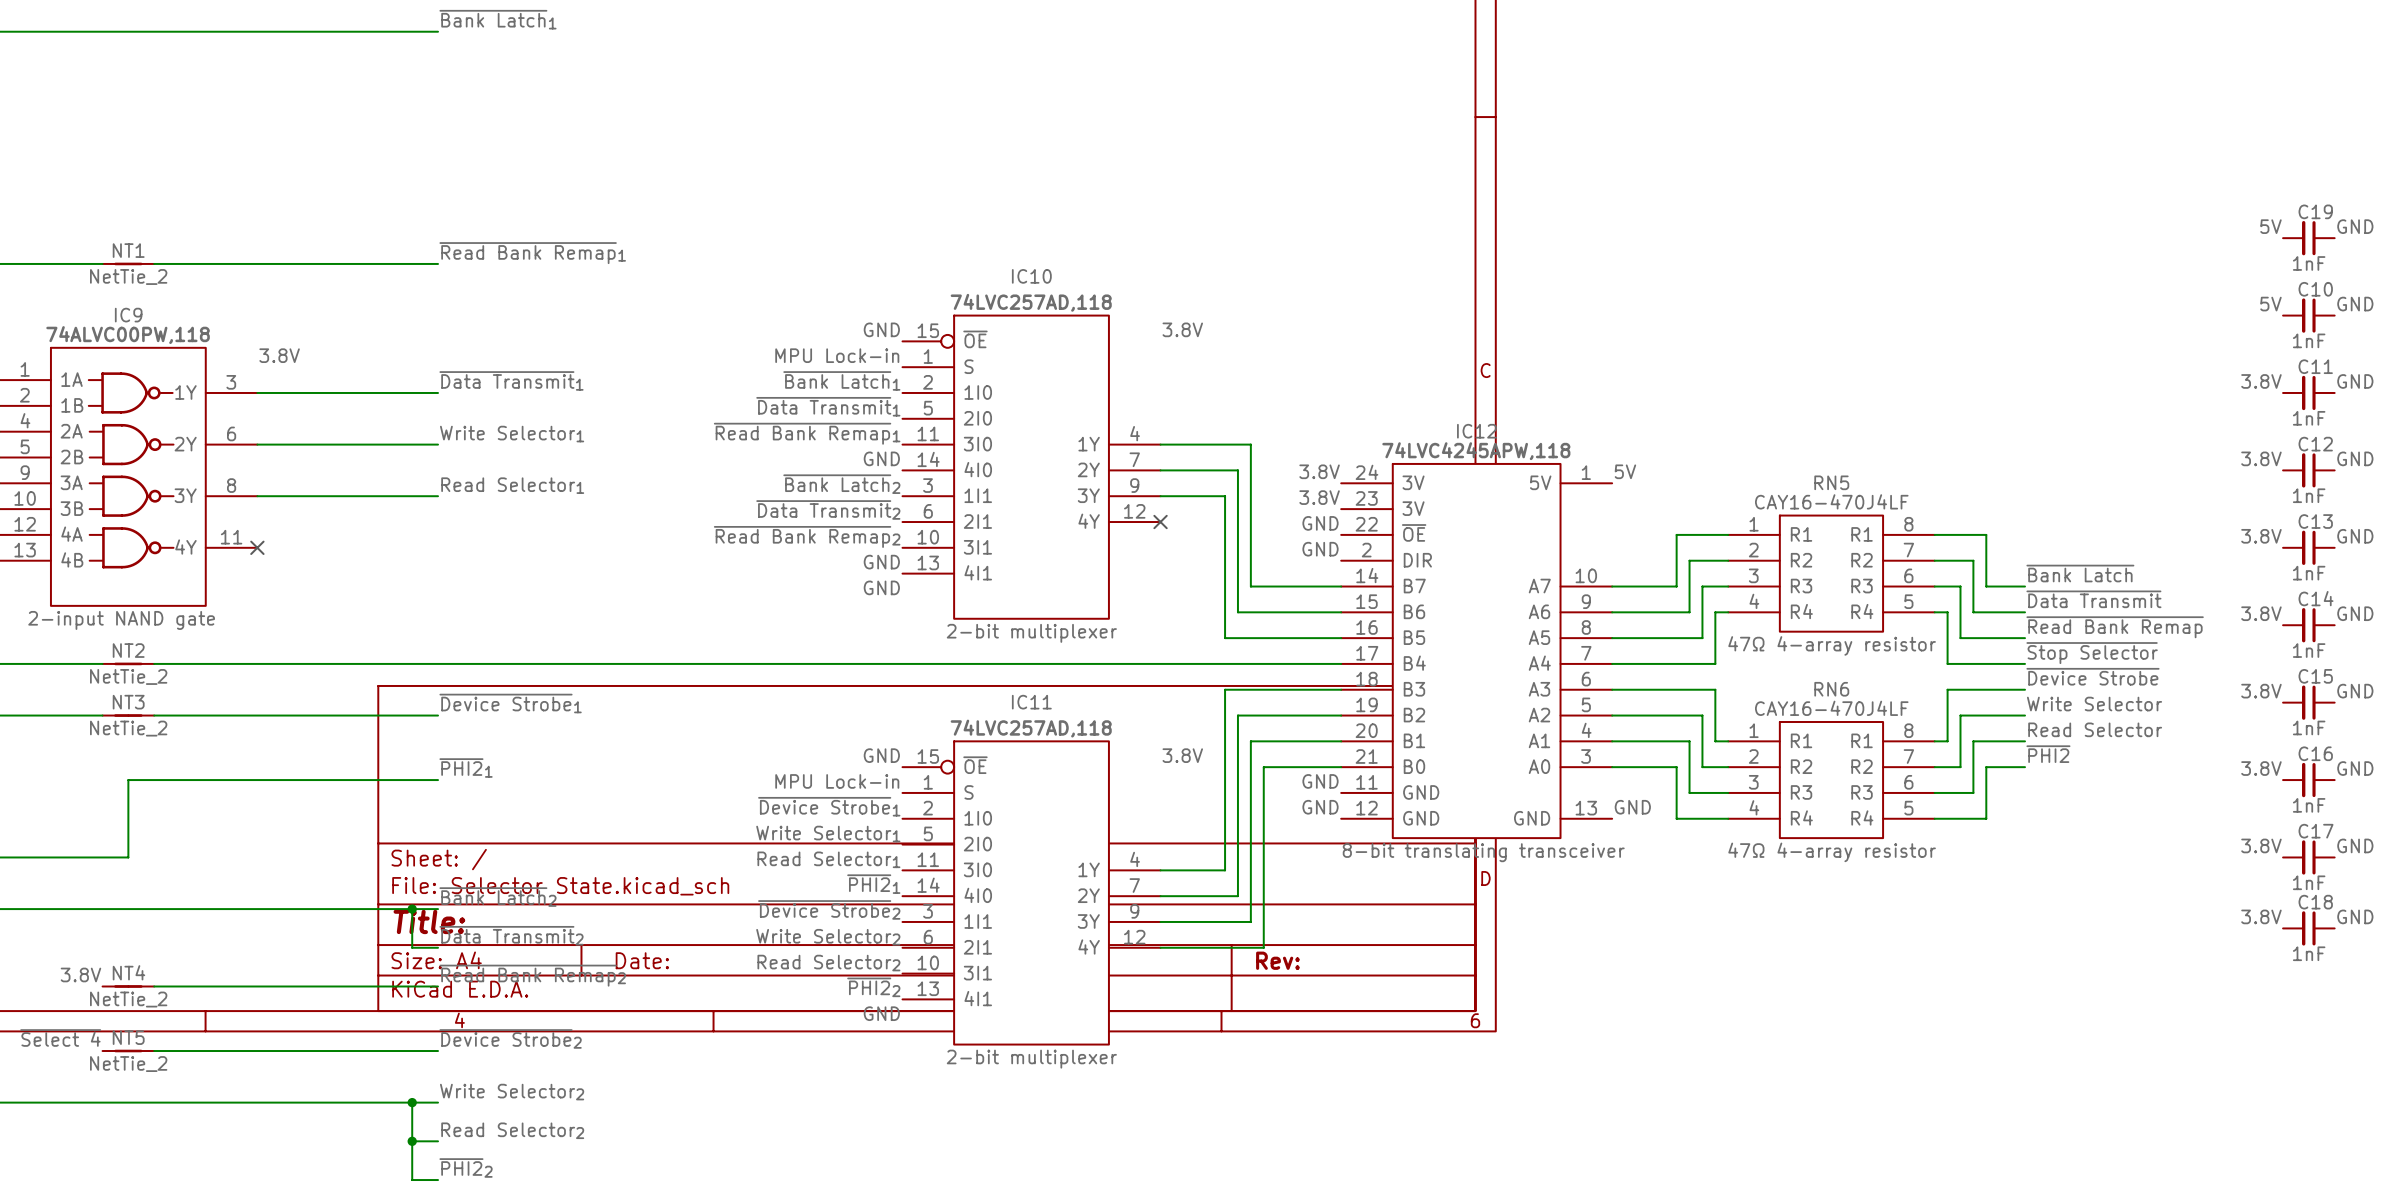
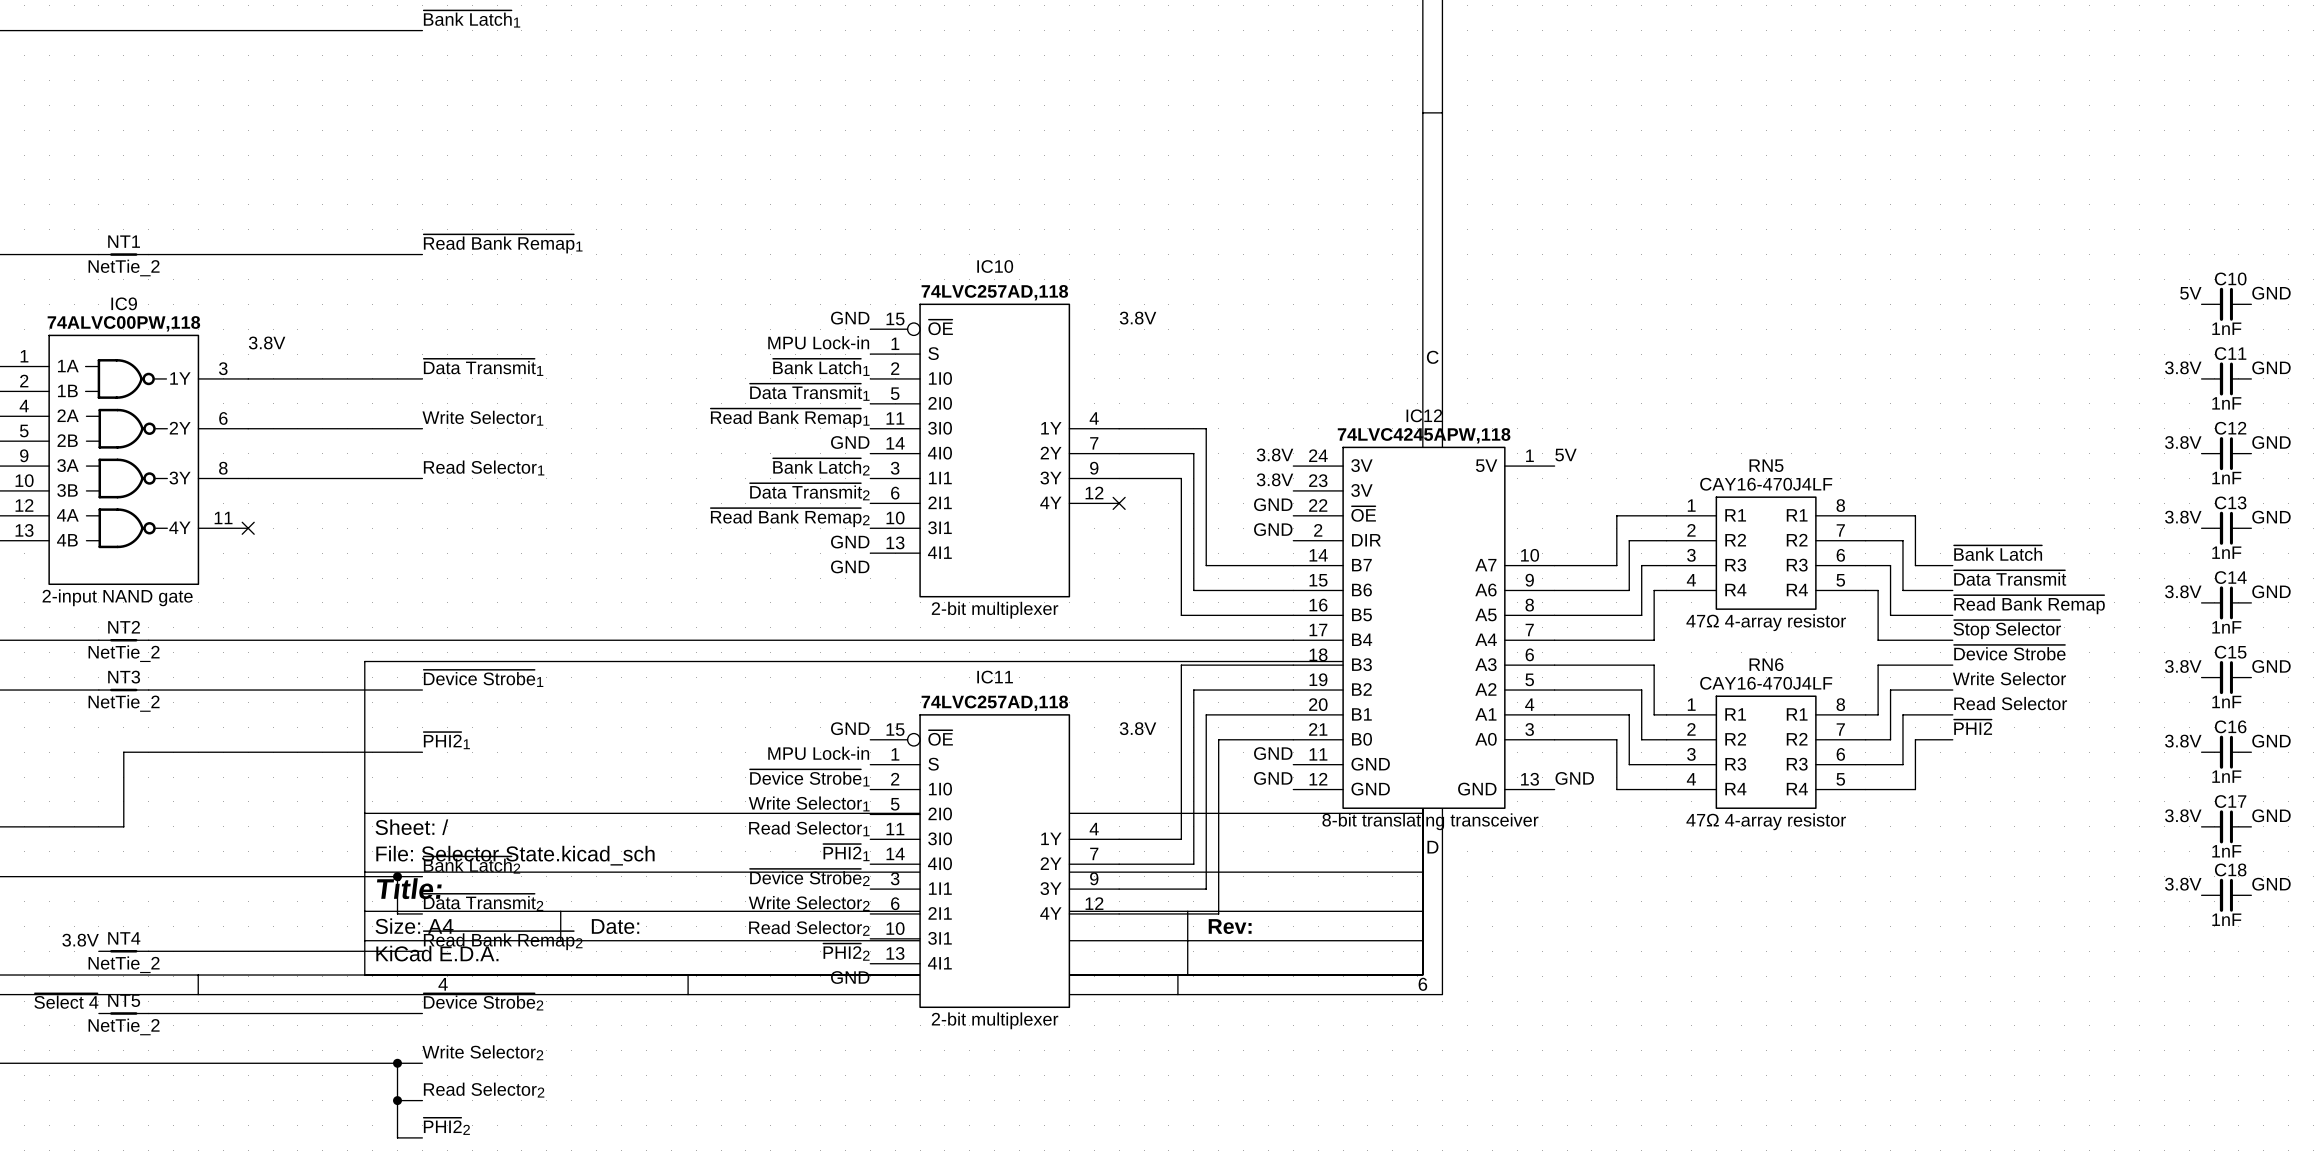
label: 5V (2270, 226) -> none
label: GND (2355, 226) -> none
C19: (2308, 238) -> none

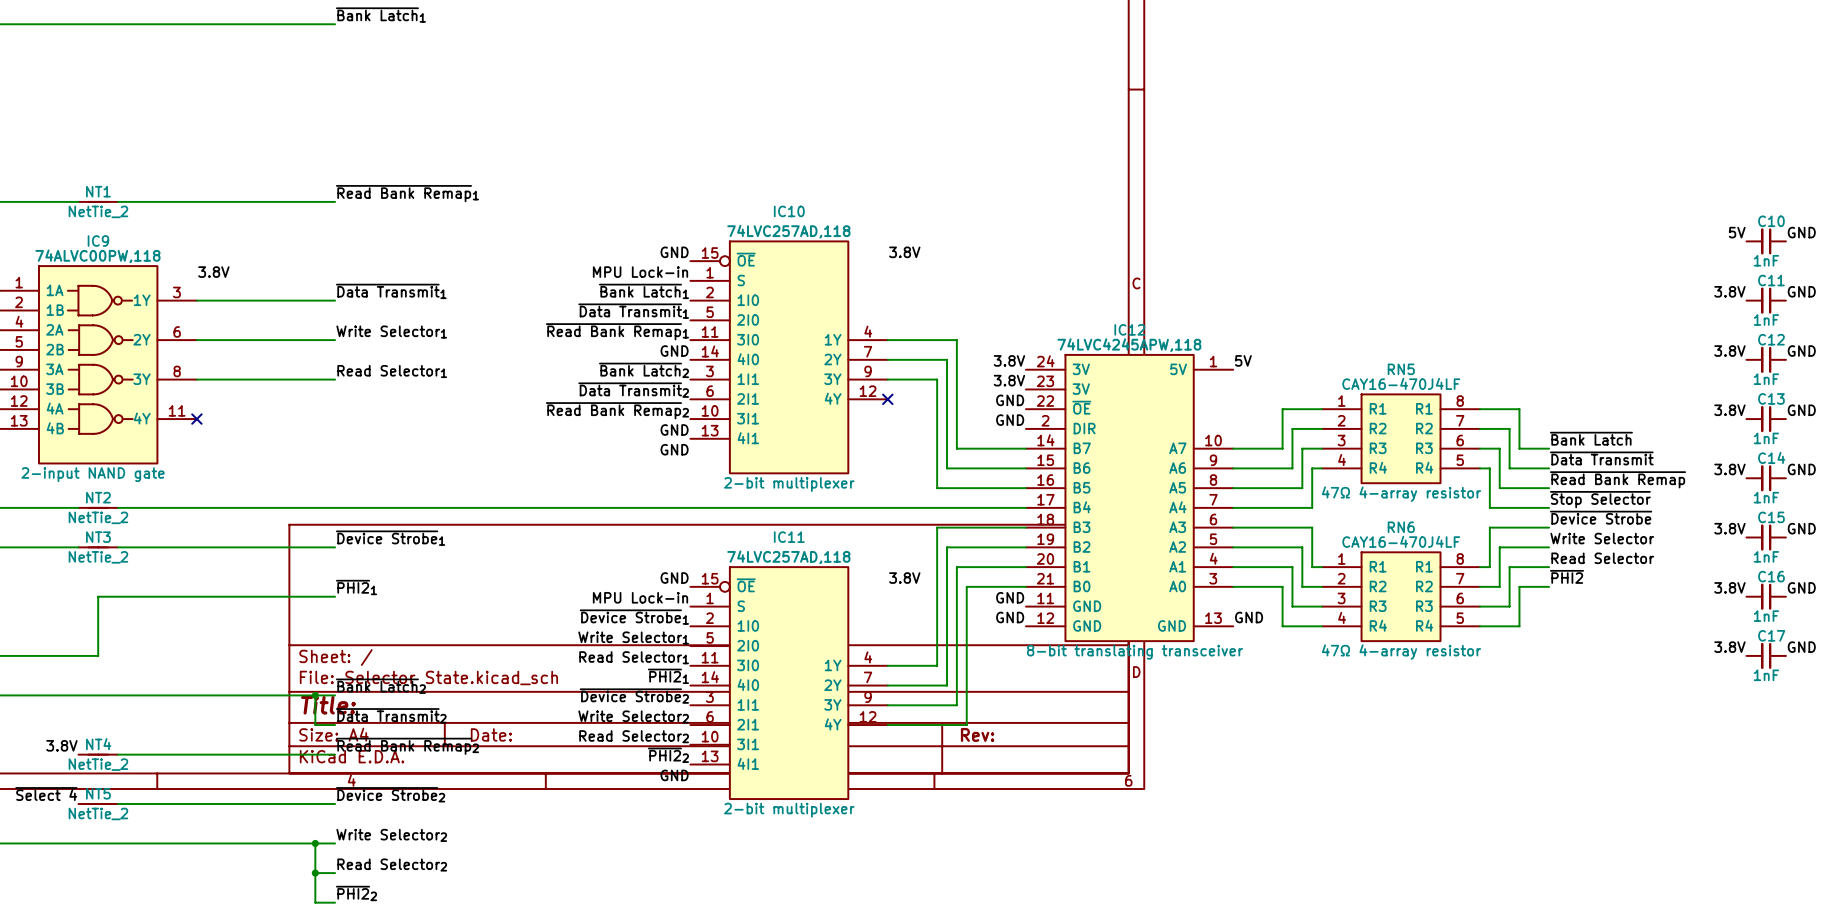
label: 3.8V (2183, 884) -> none
label: GND (2271, 884) -> none
C18: (2226, 895) -> none

